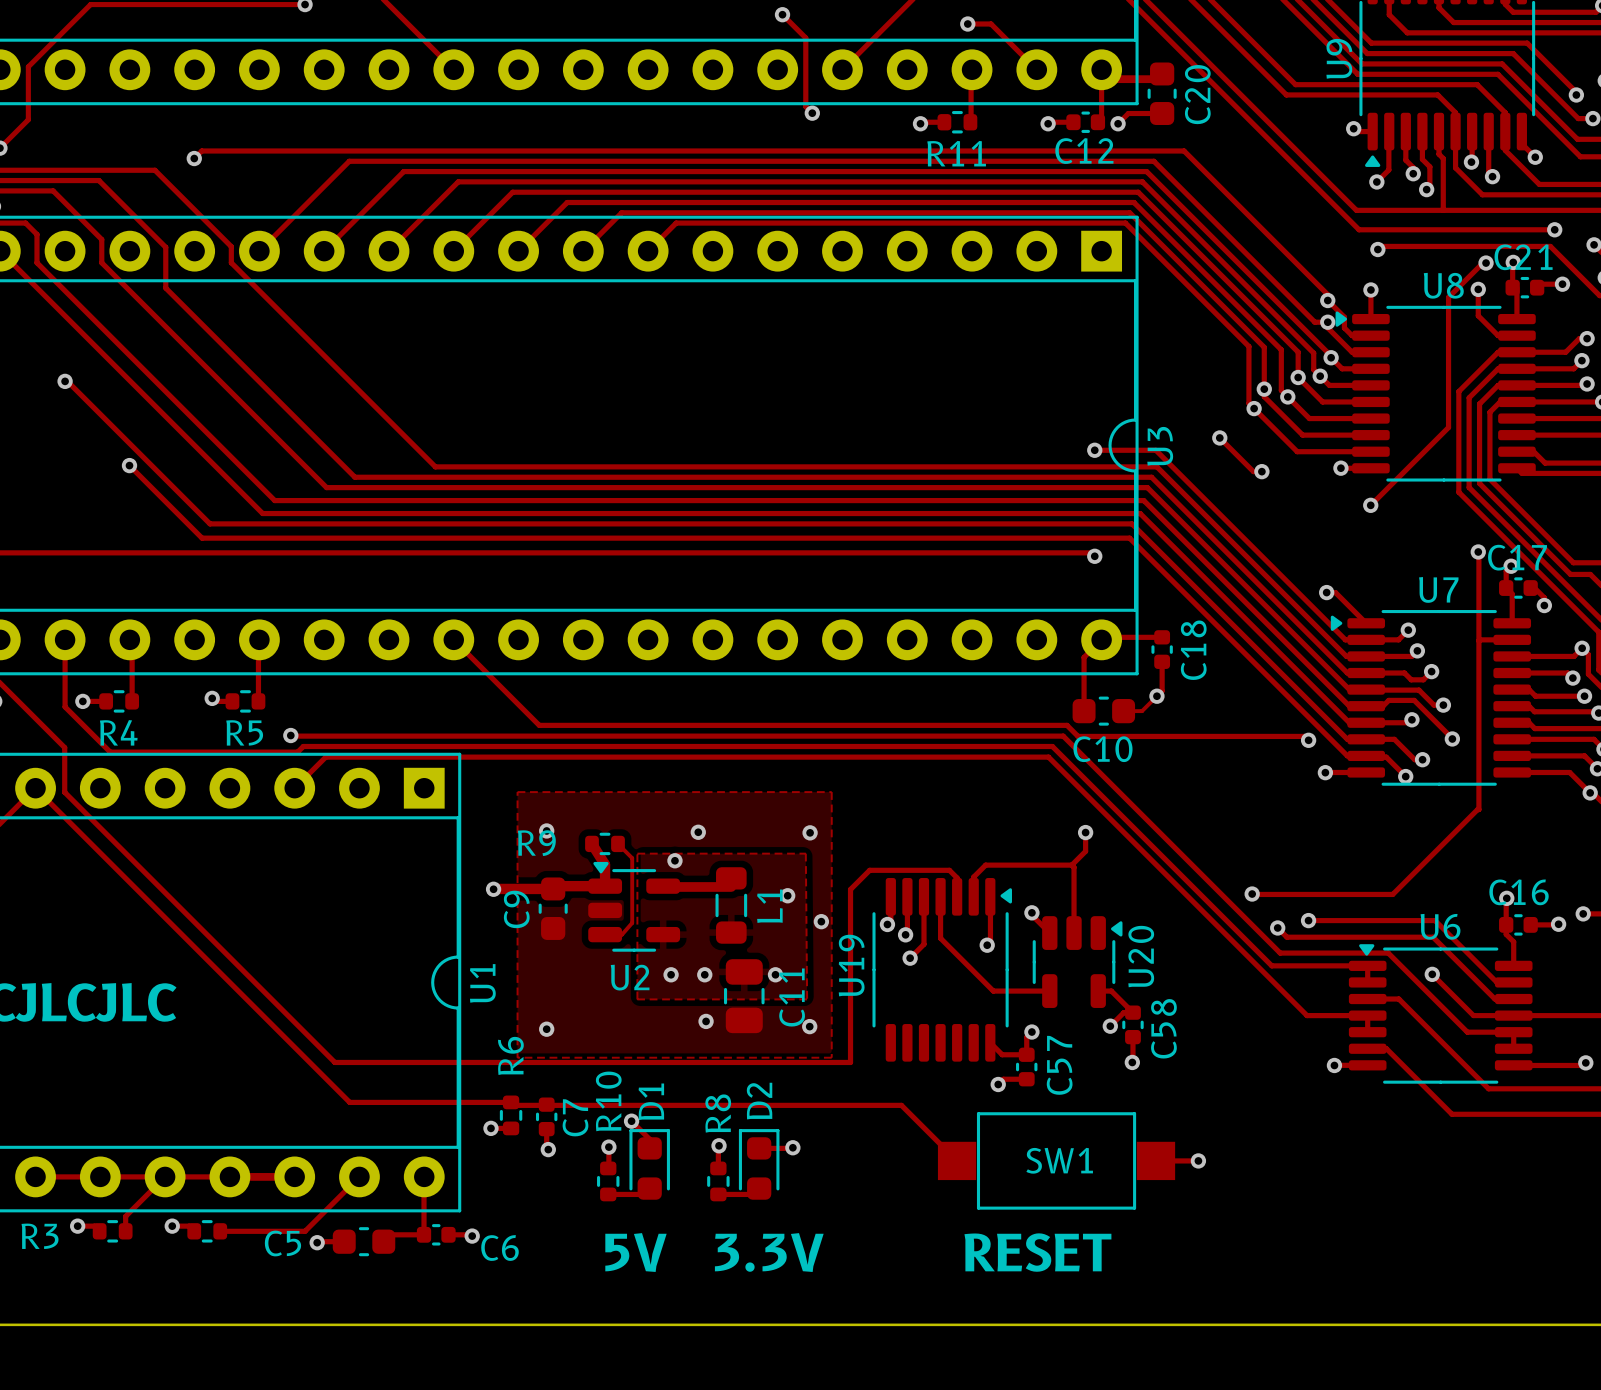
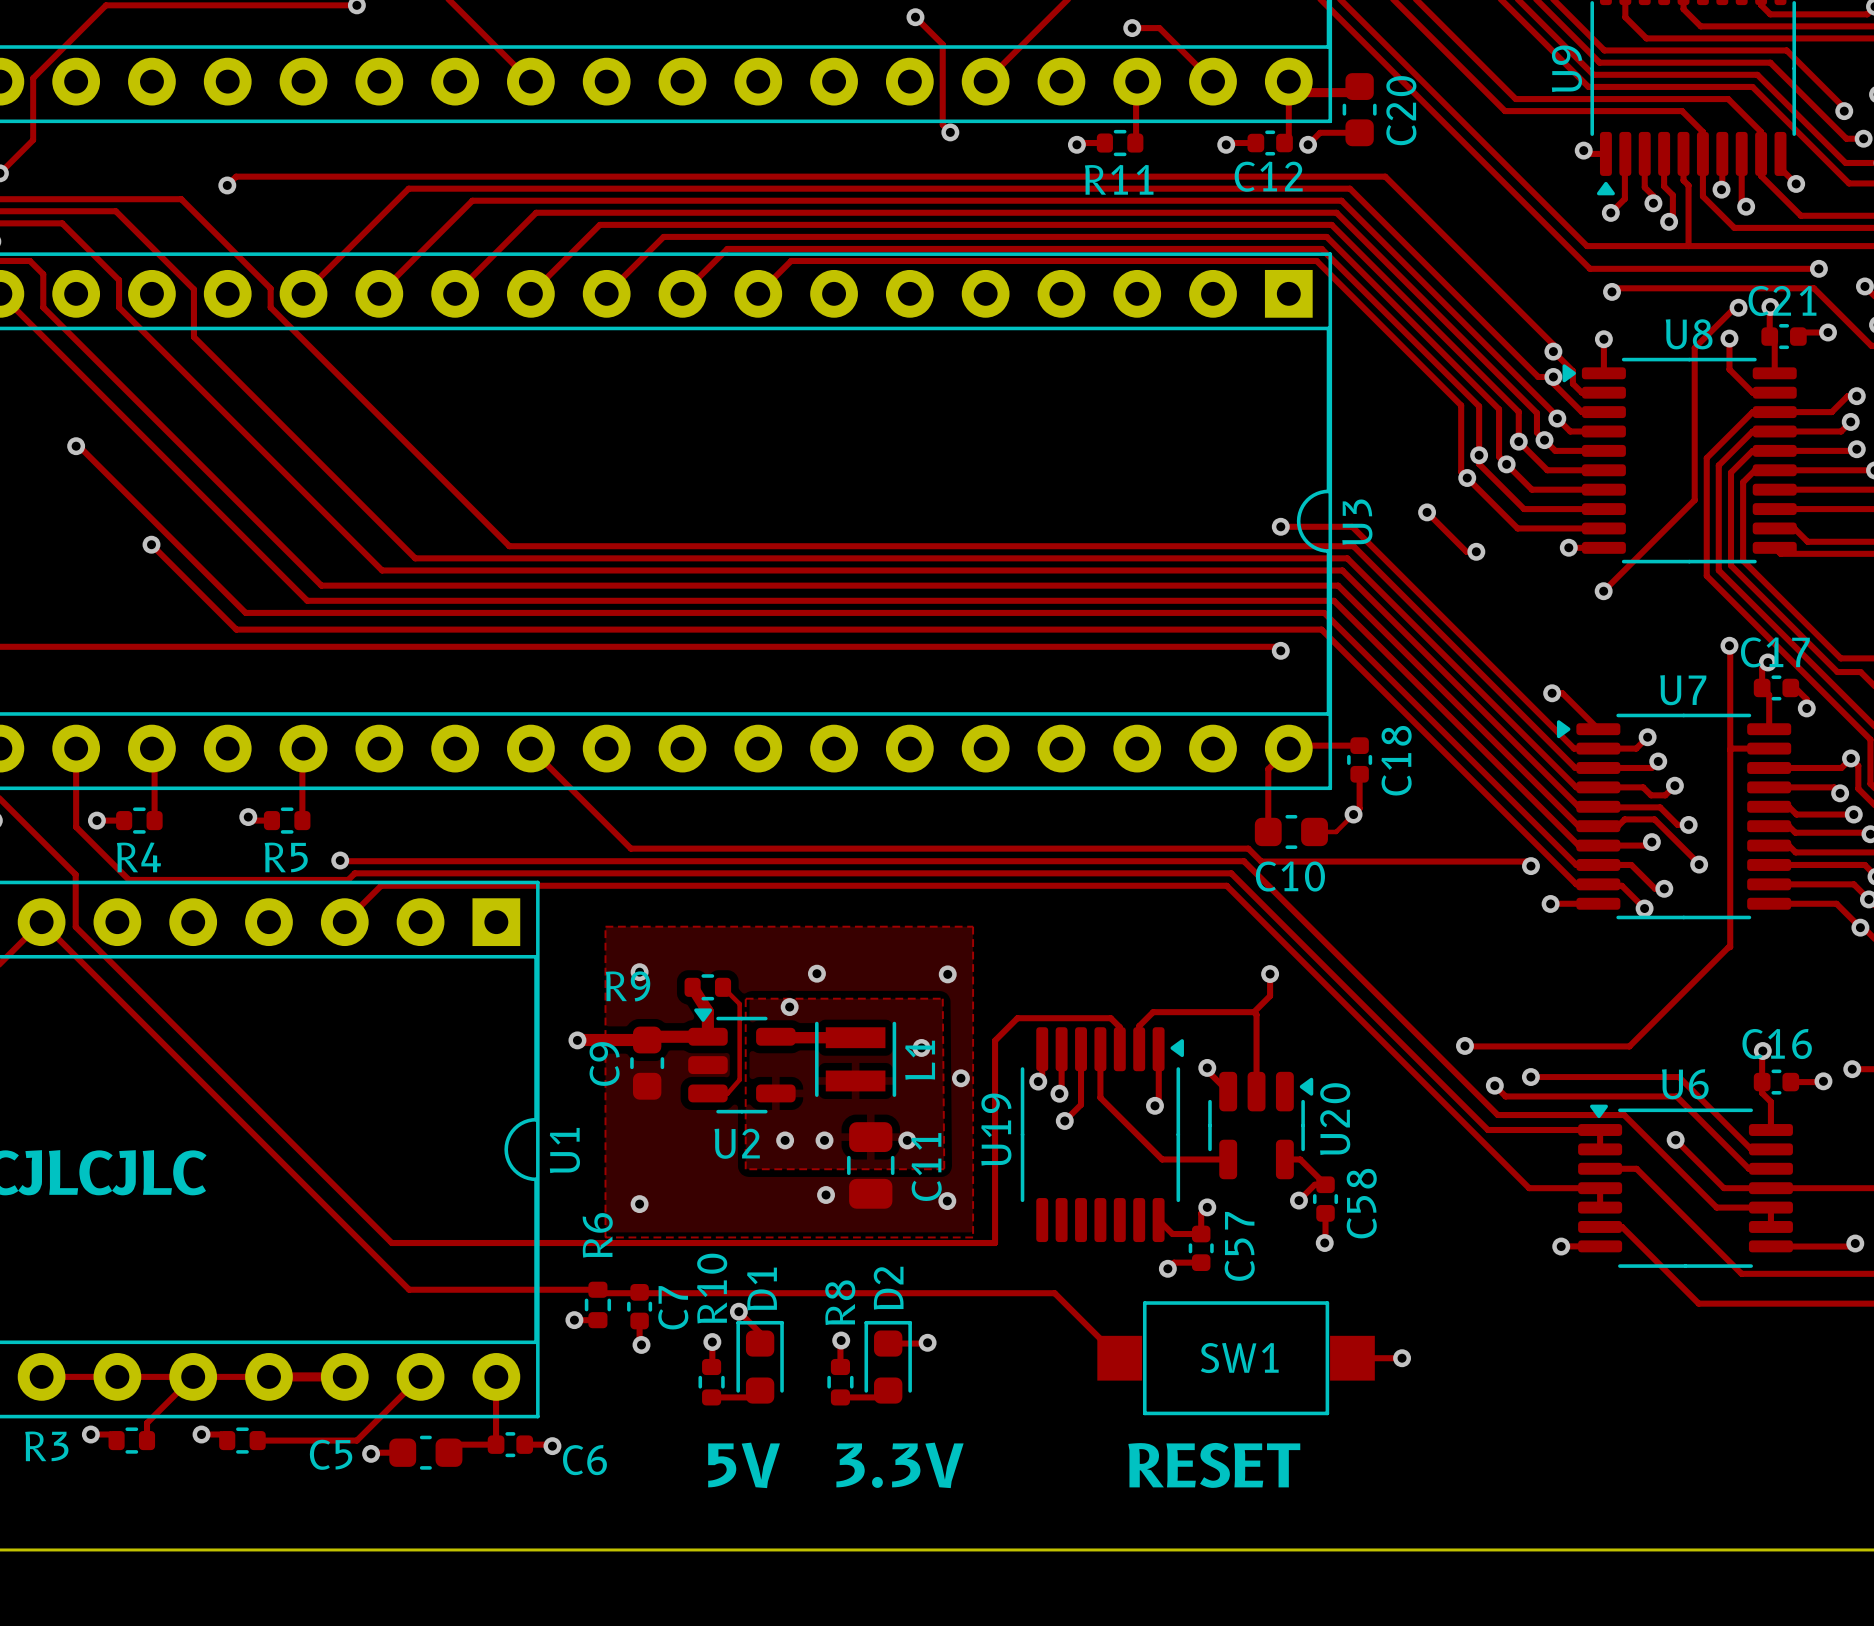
L1 footprint: [715, 867, 748, 944] -> [815, 1021, 897, 1097]

